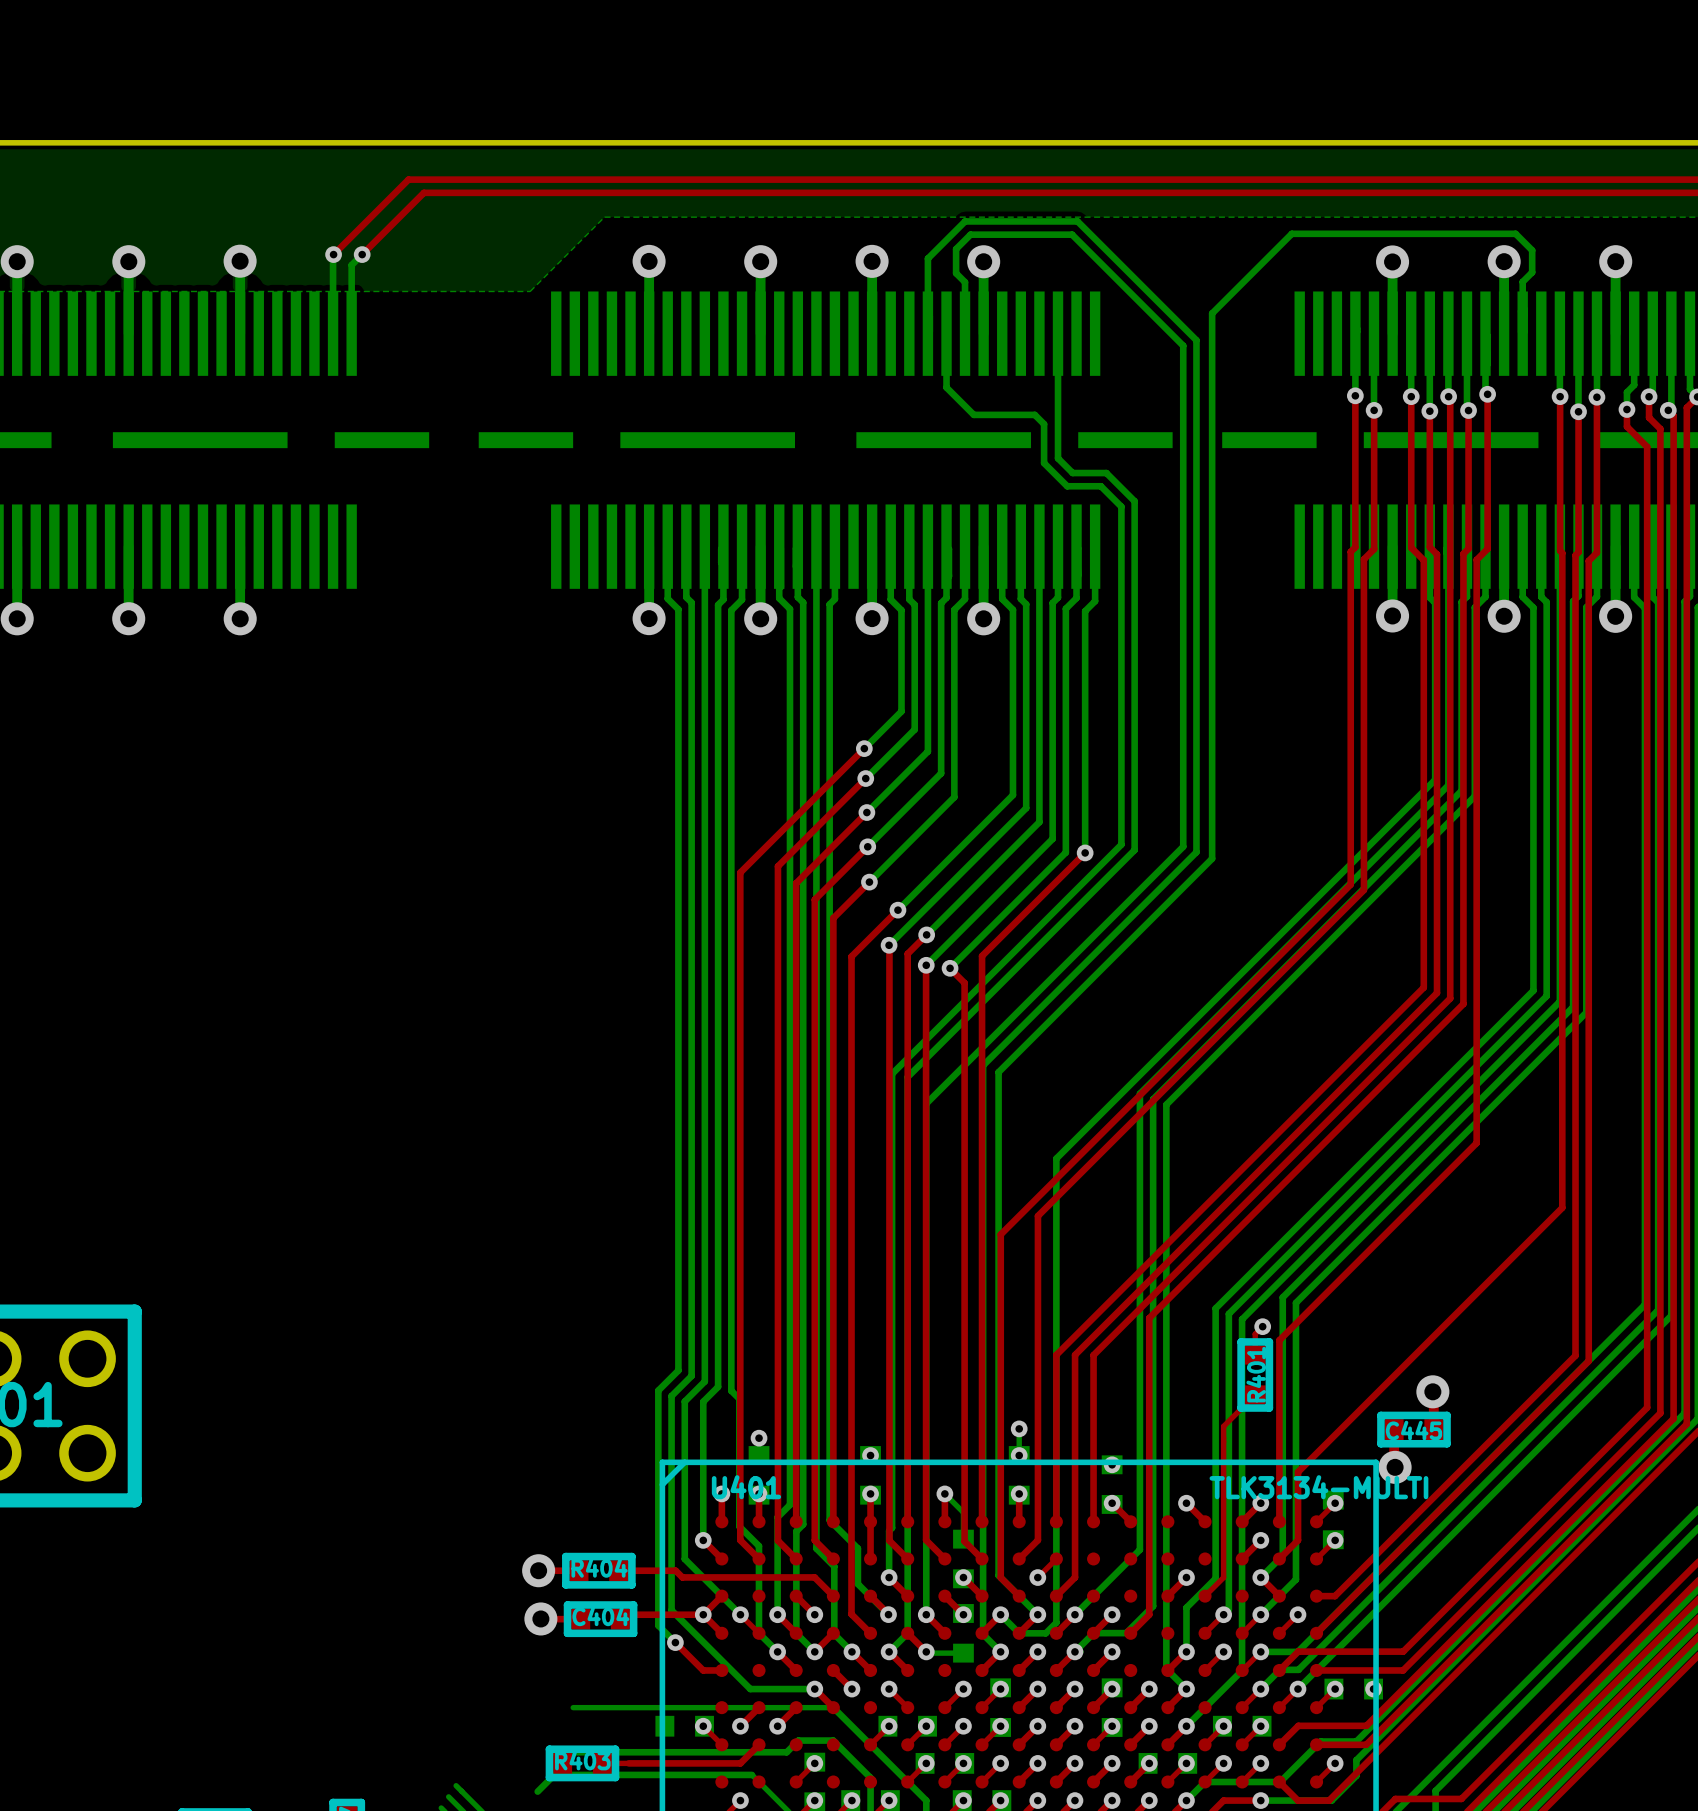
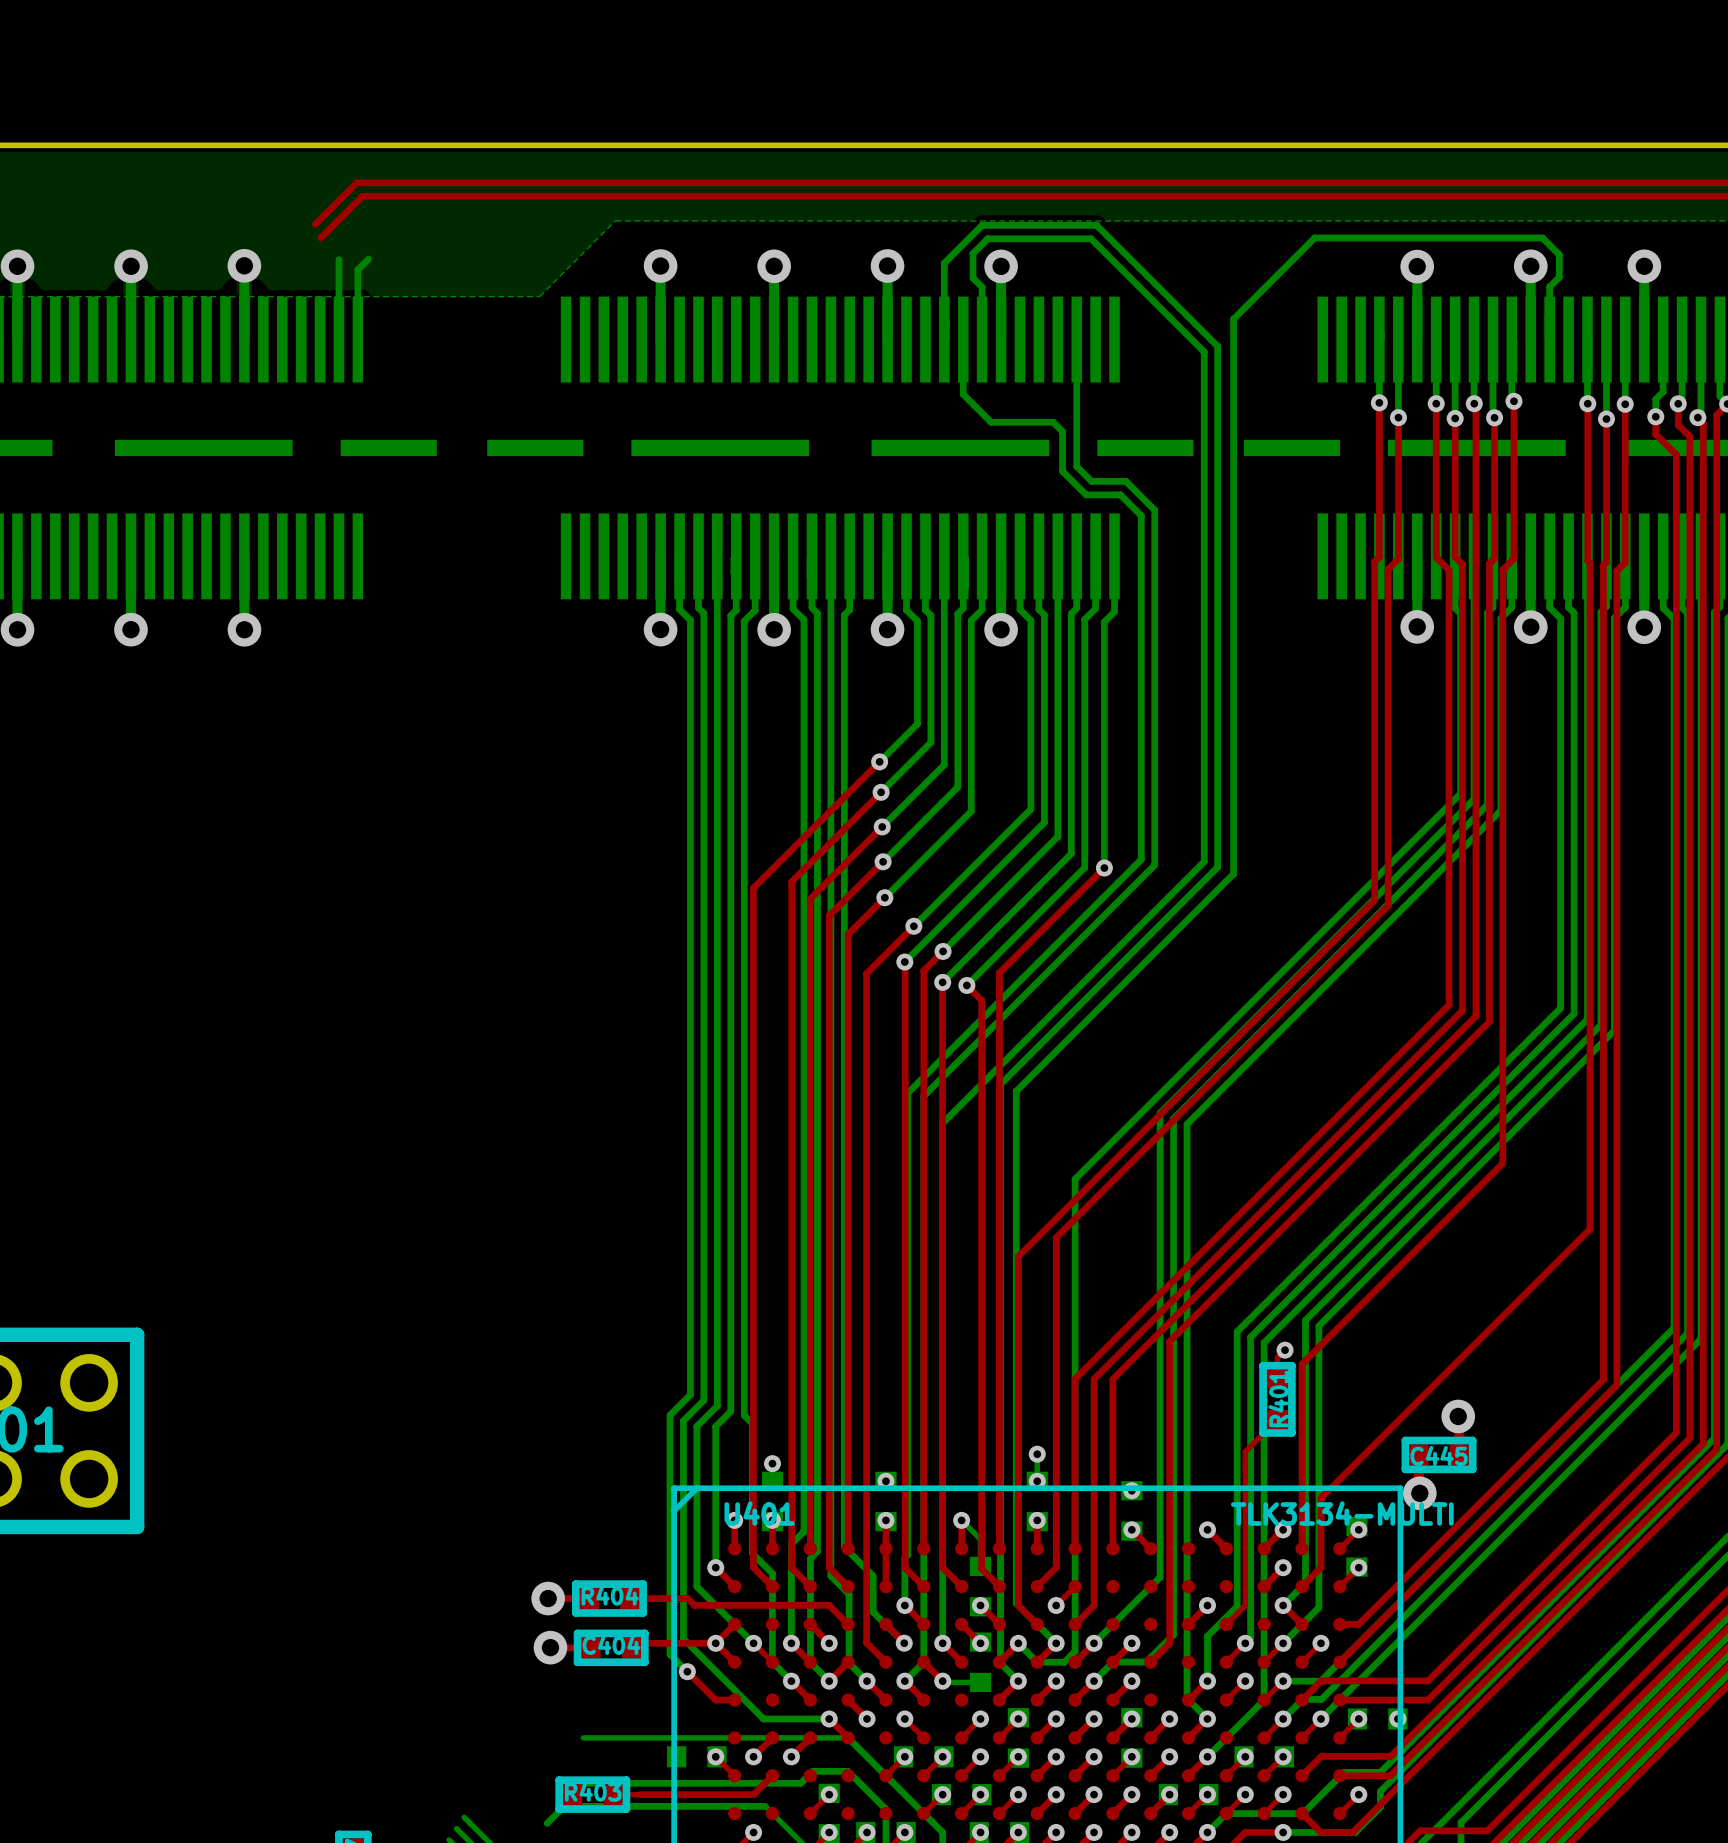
top track: (408, 179) (333, 254) -> (415, 182) (356, 182) (315, 224)
top track: (423, 192) (362, 254) -> (431, 196) (362, 196) (320, 237)
via: (333, 254) -> none
via: (362, 254) -> none

